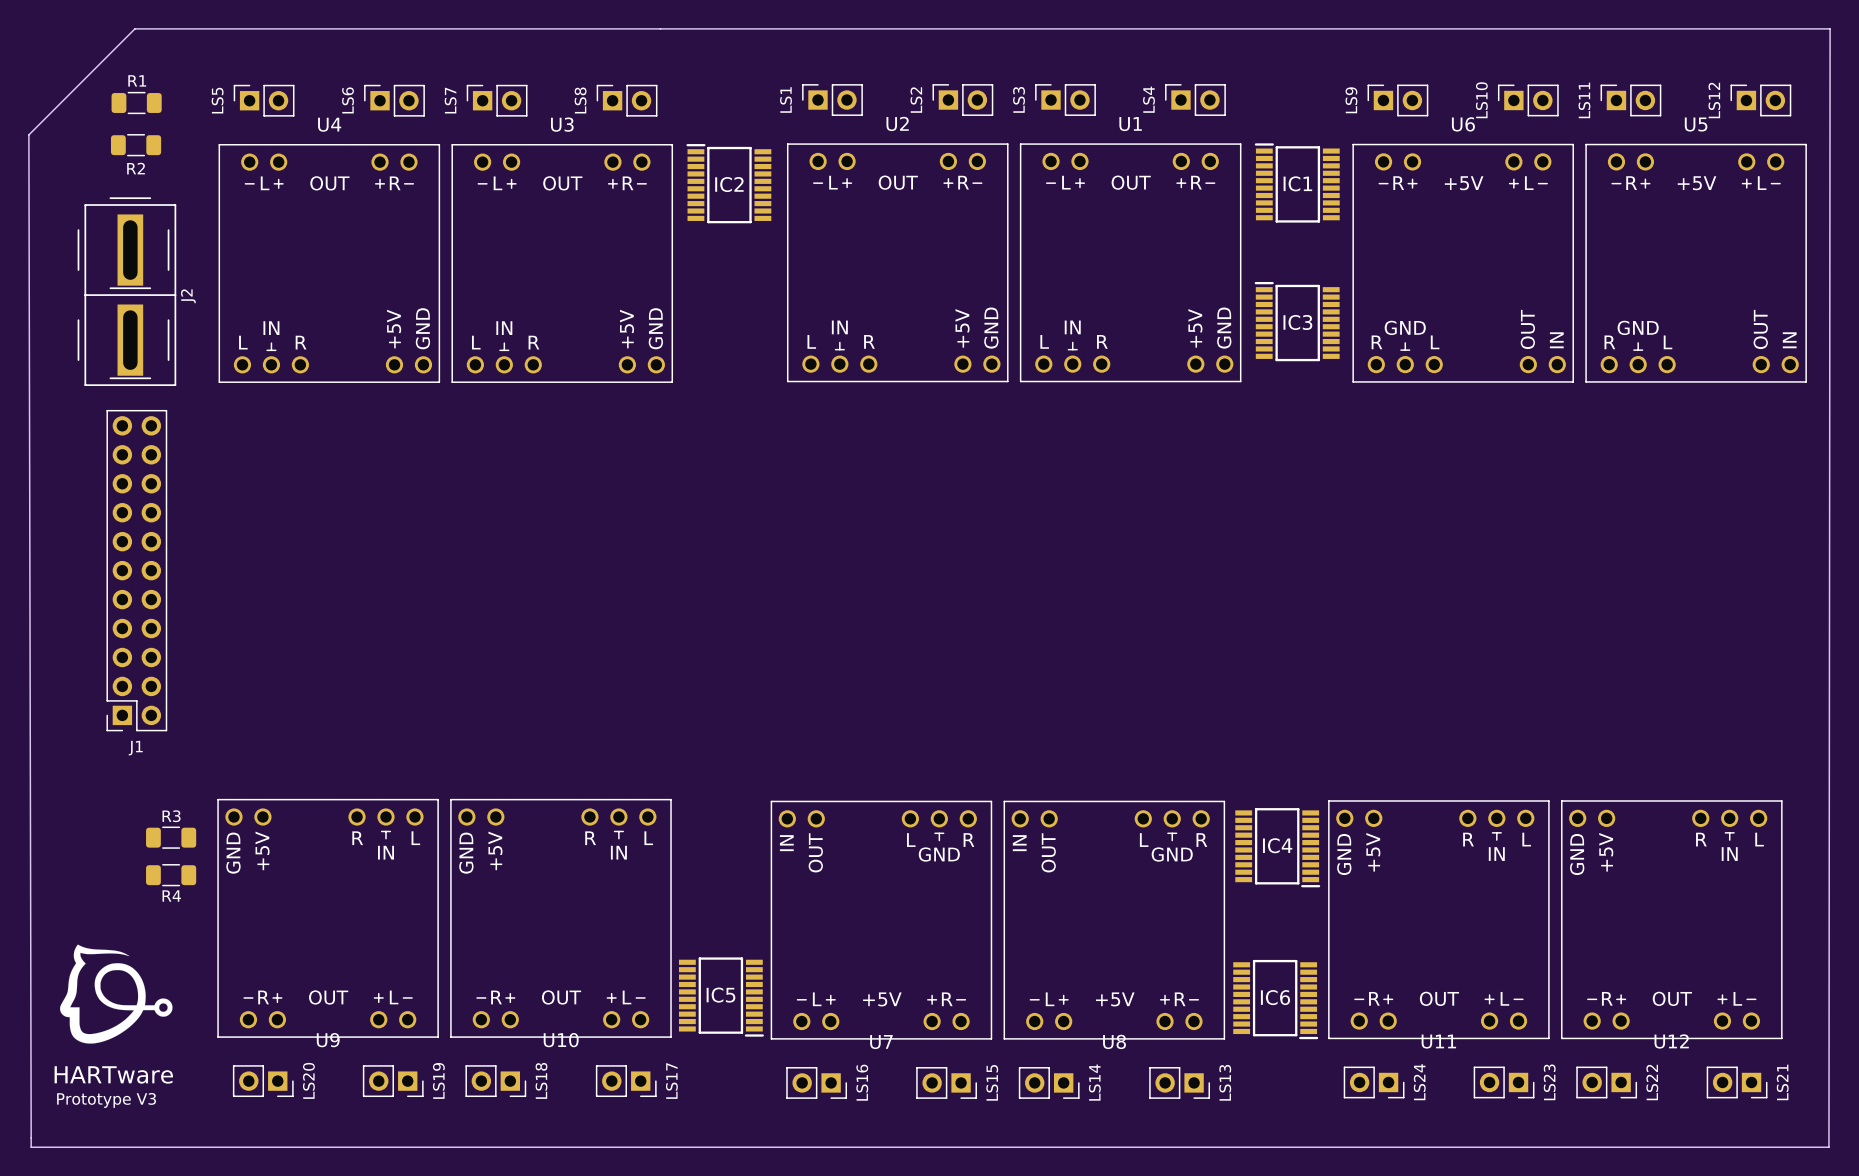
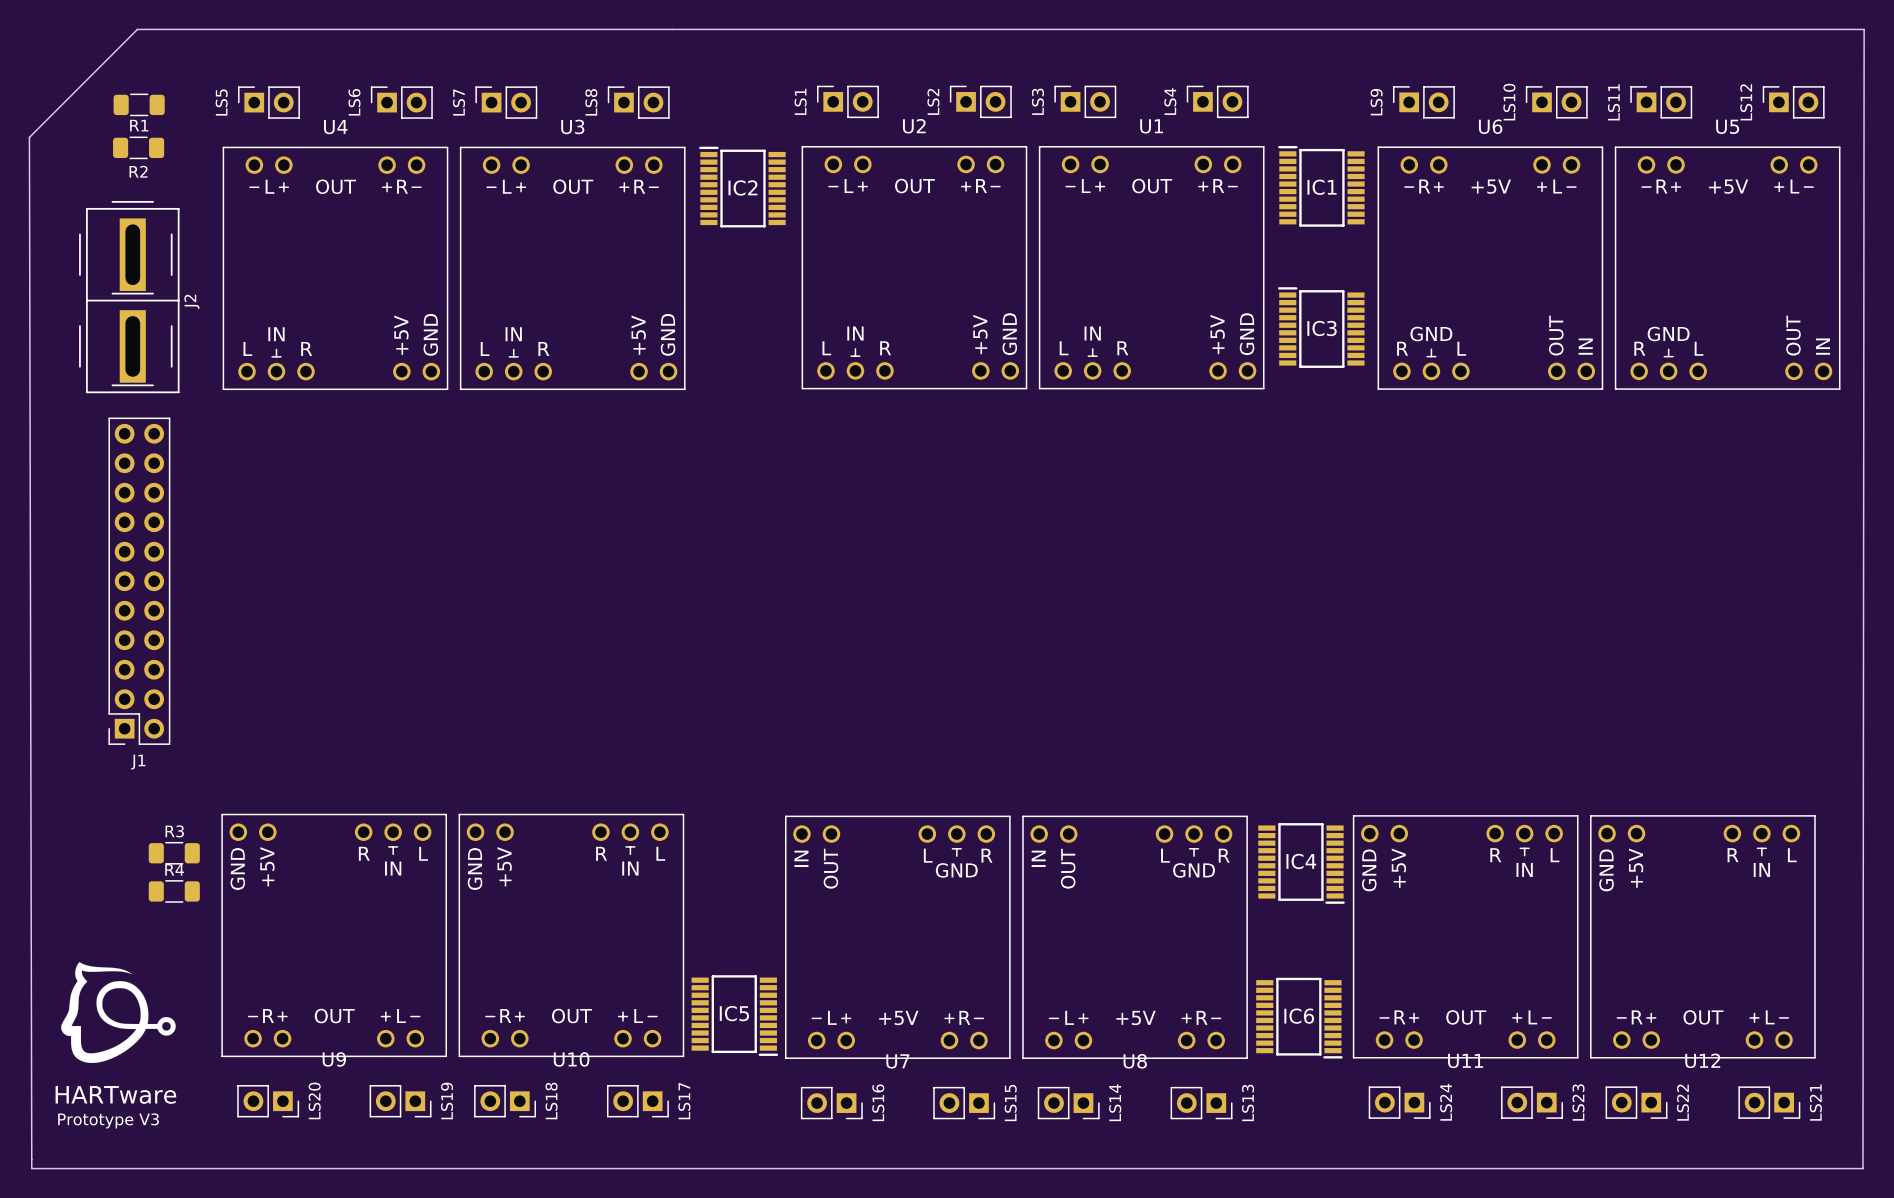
R1 name position: R1 (137, 80) -> R1 (139, 125)
R4 name position: R4 (171, 896) -> R4 (174, 869)

